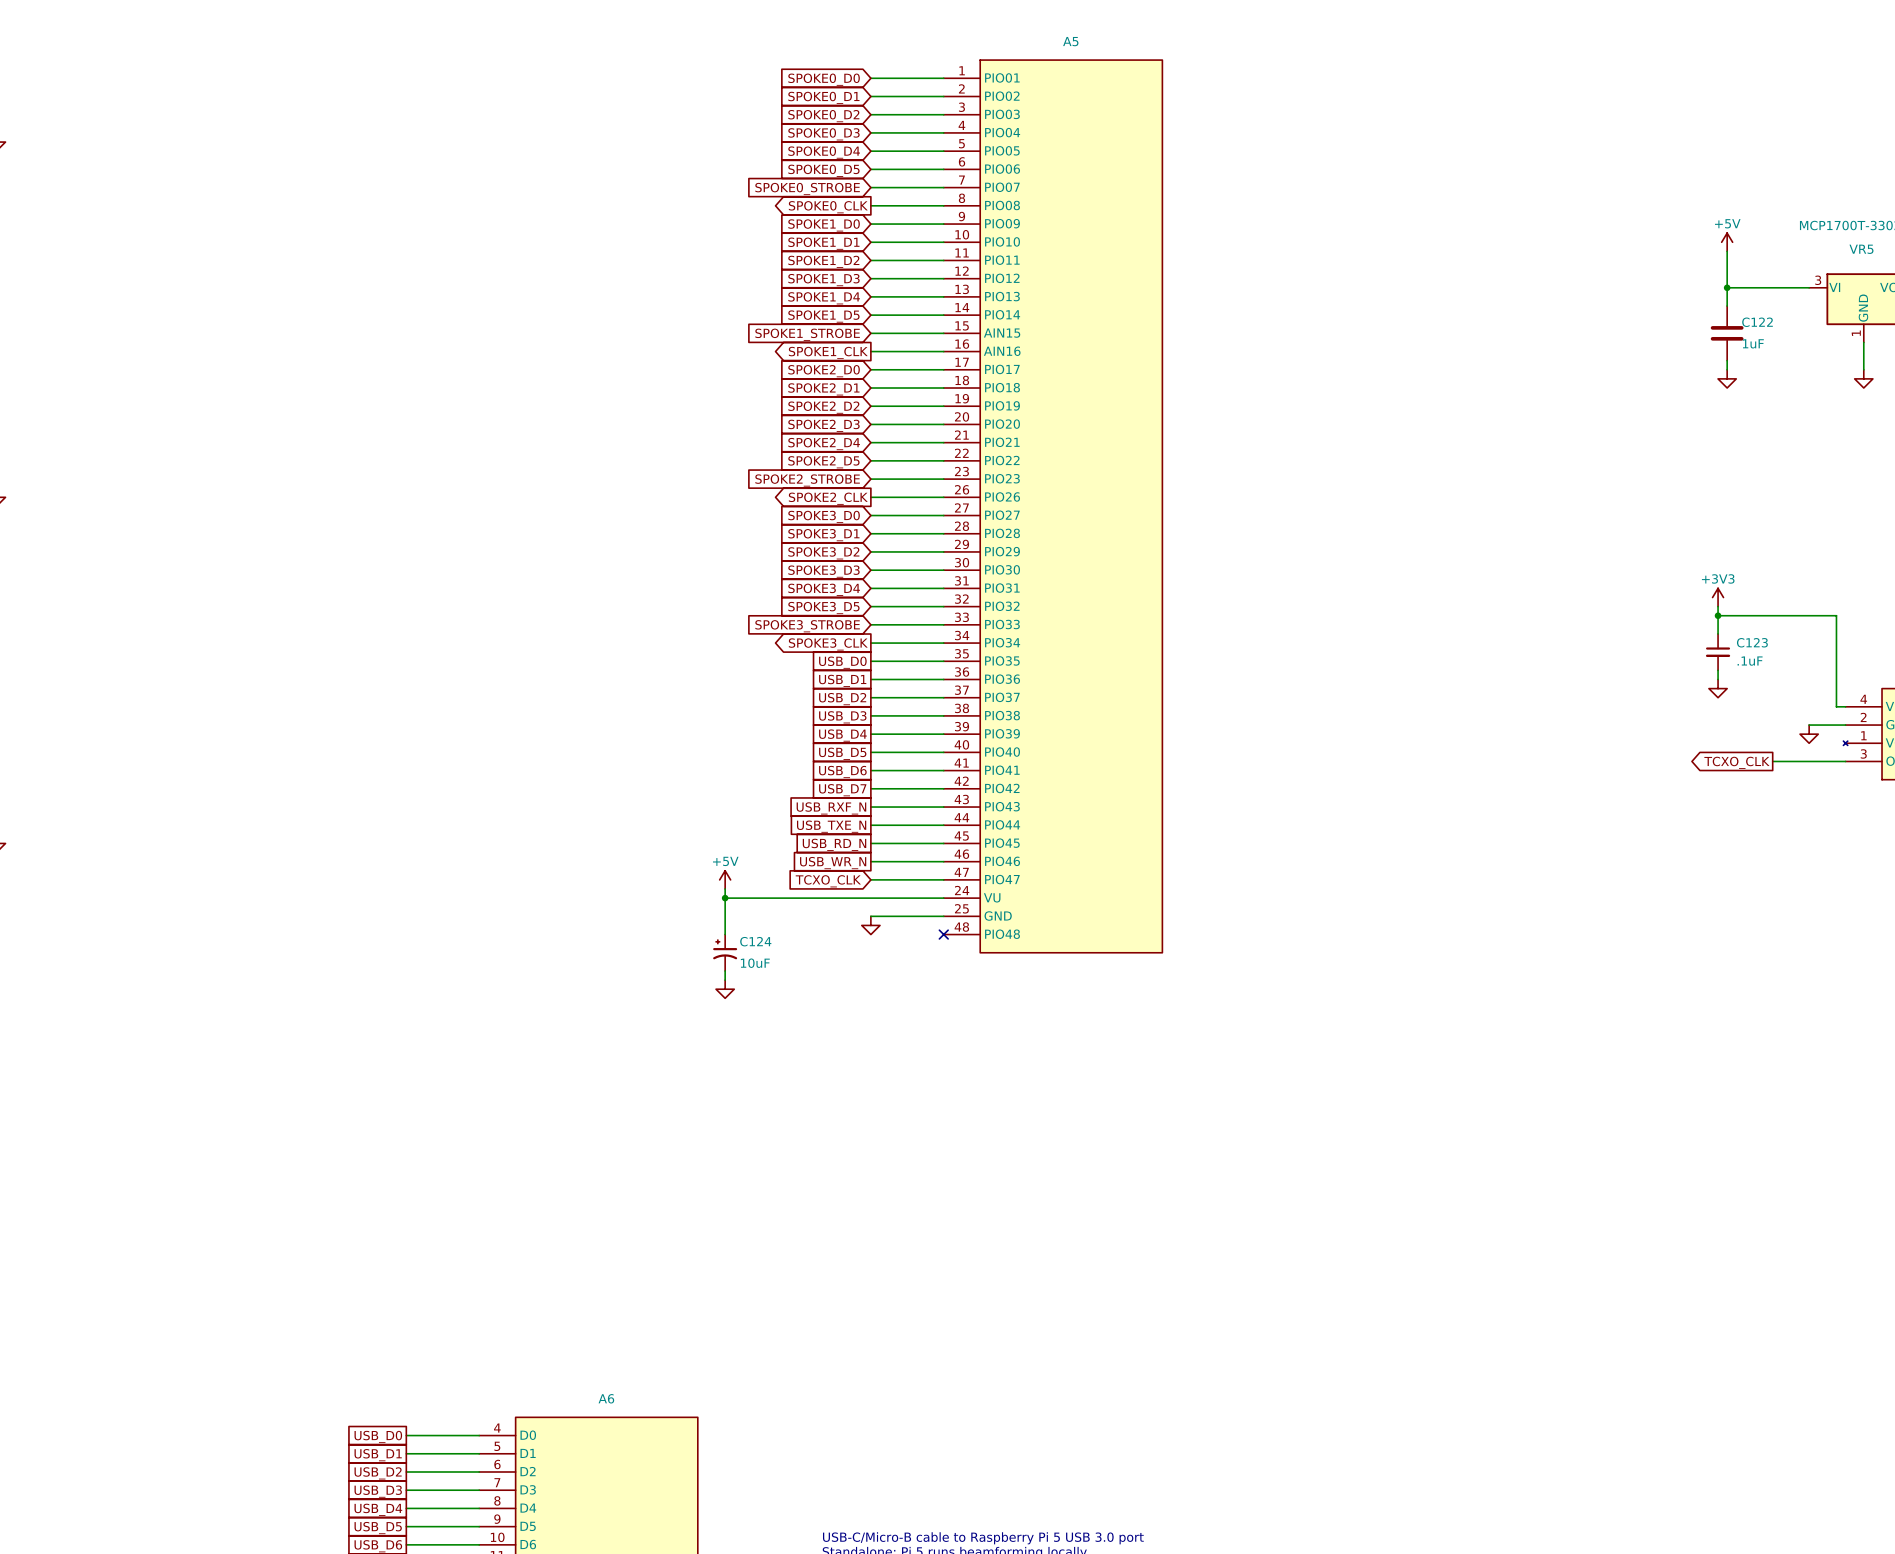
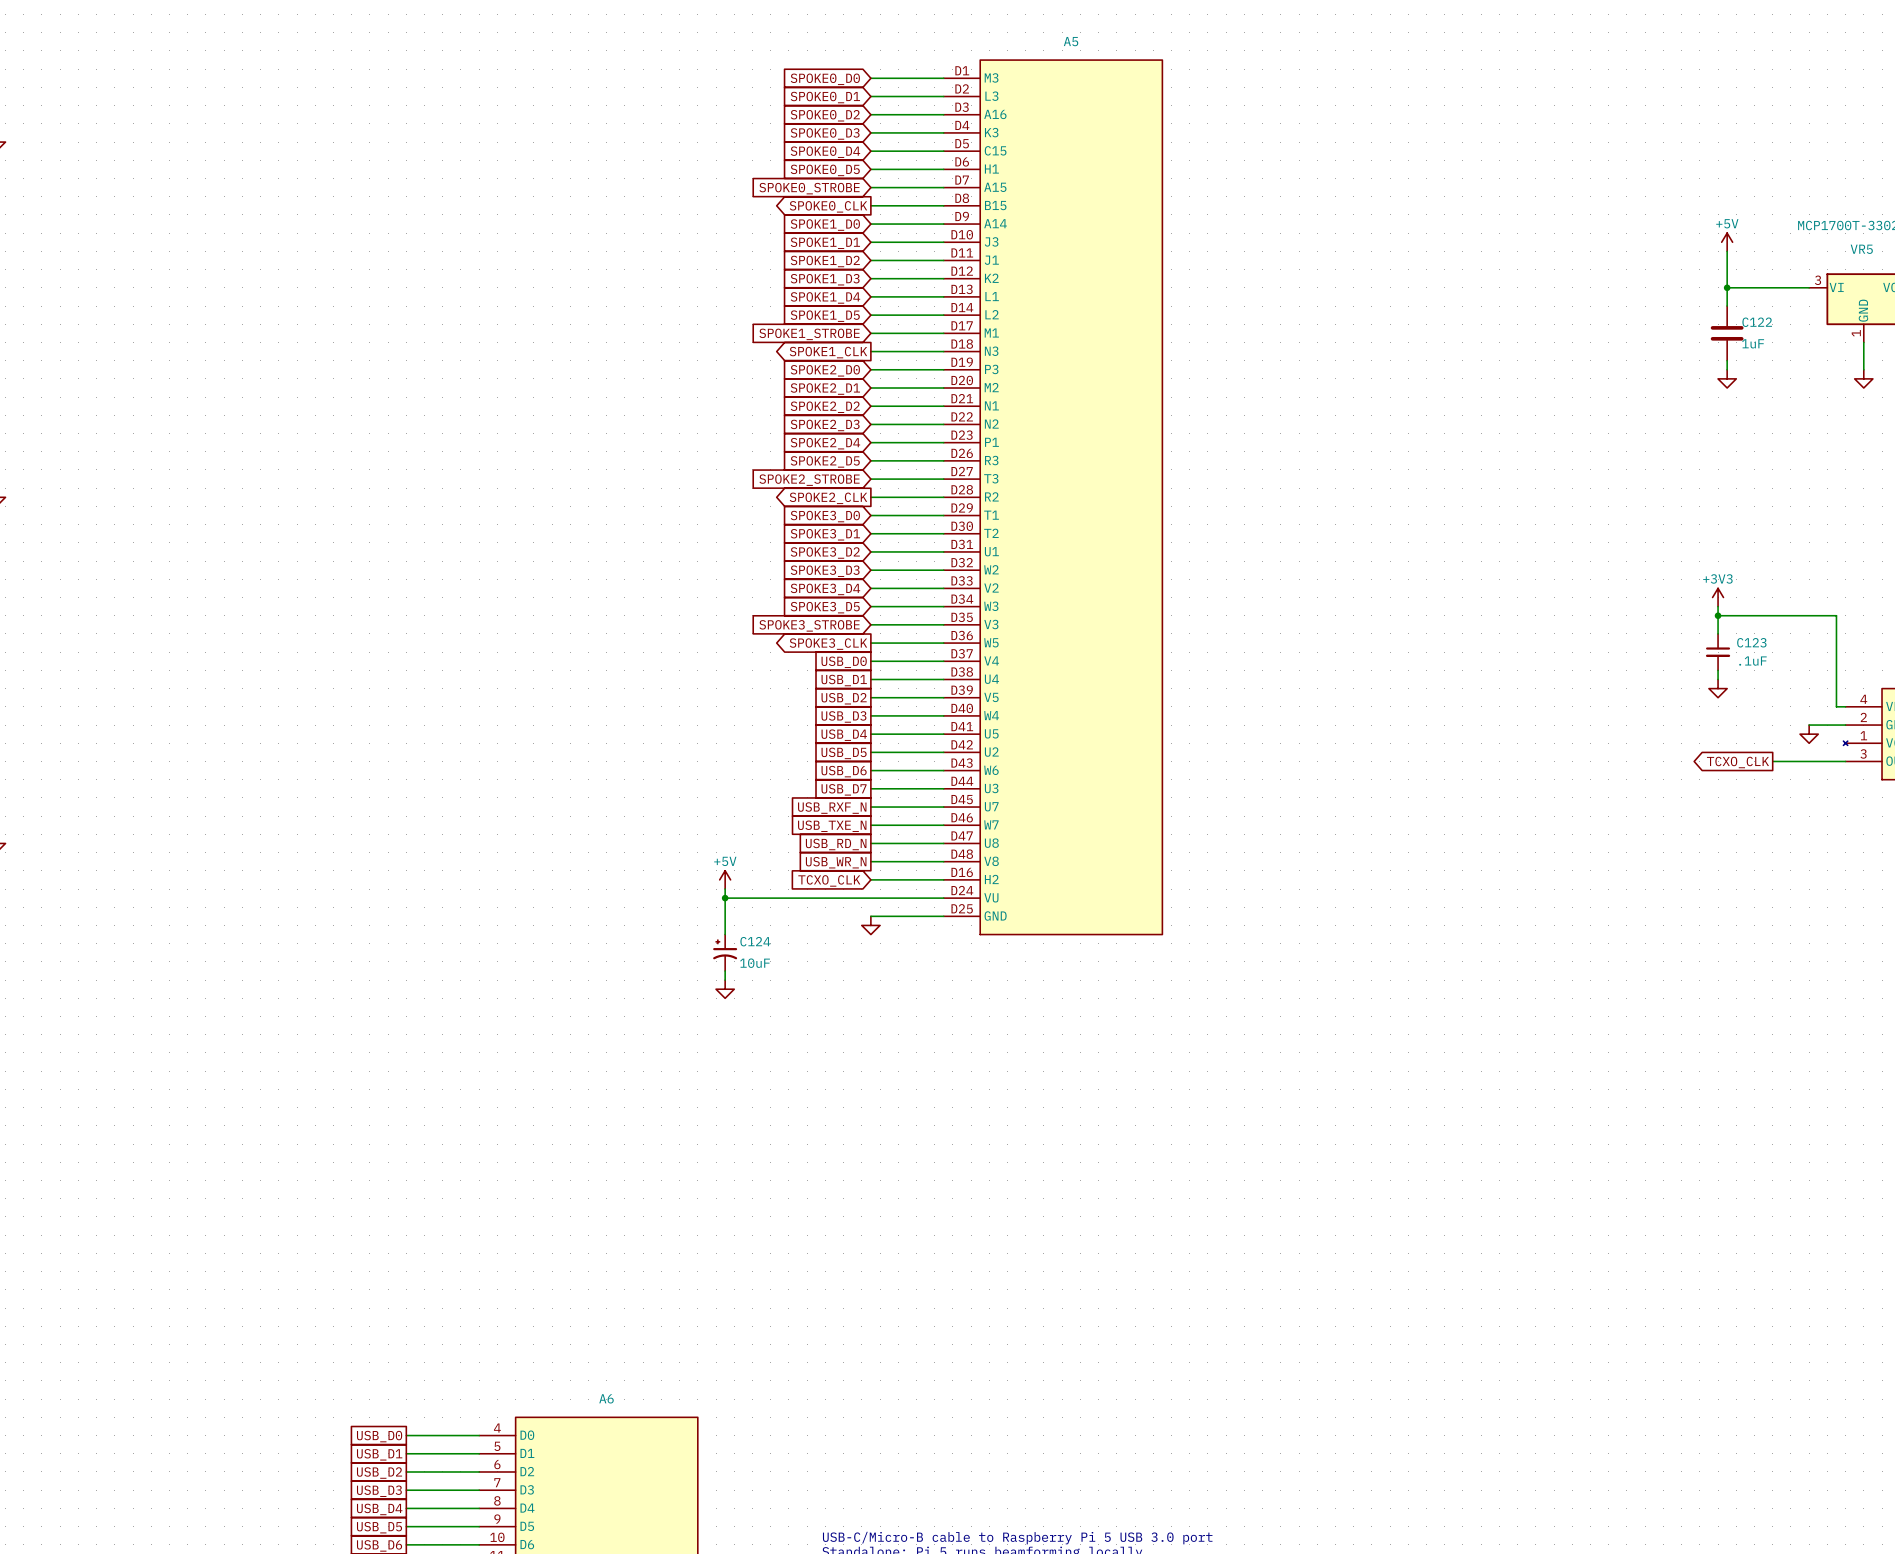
A5 symbol: [943, 60, 1163, 953] -> [943, 60, 1163, 935]
no-connect mark: (943, 934) -> none

